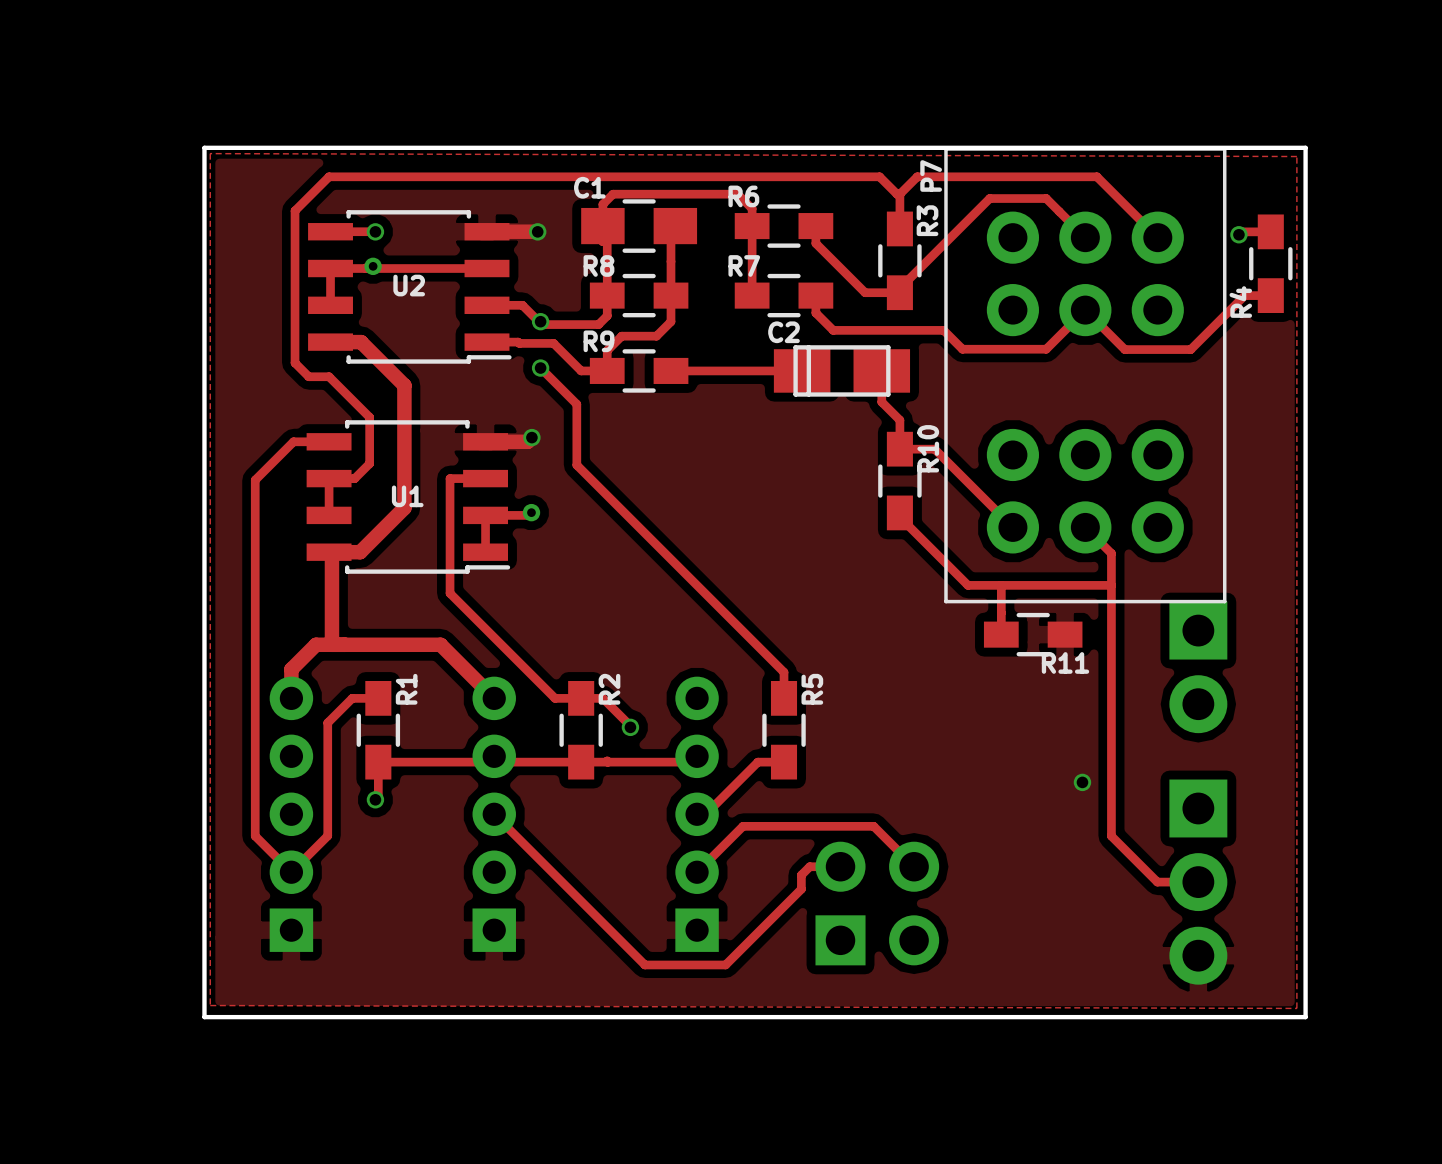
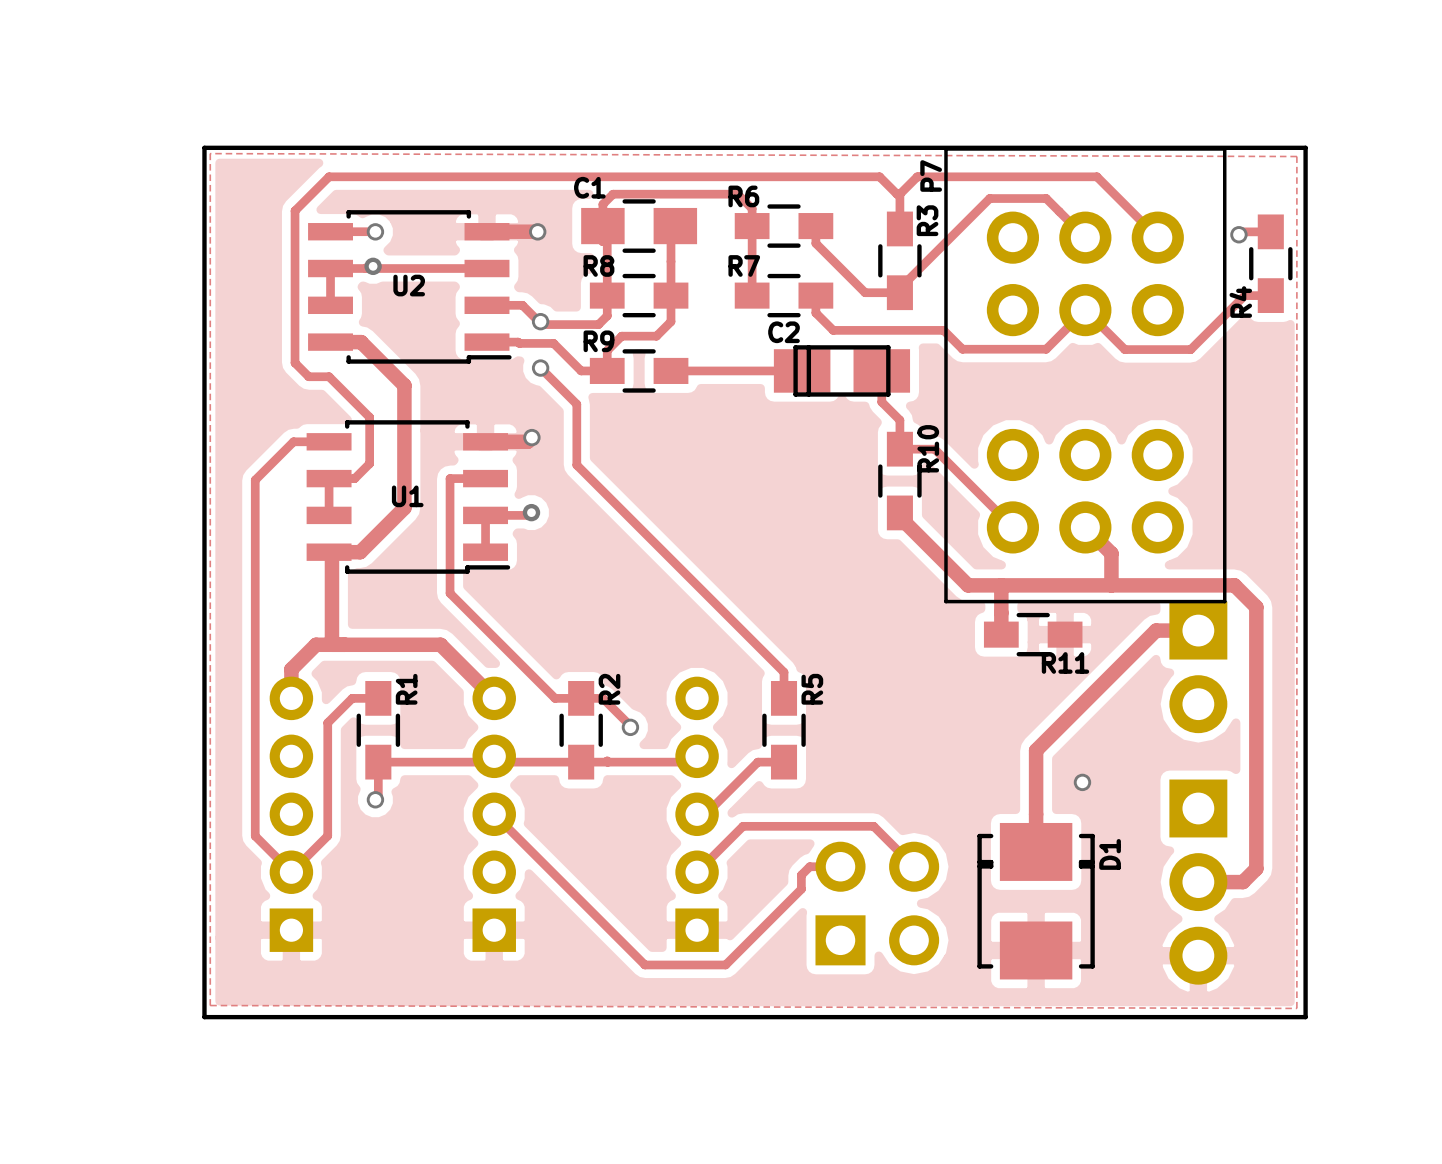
track width: thin (899, 512) (899, 517) (968, 585) (1111, 585) (1111, 553) (1085, 527) -> thick (899, 512) (899, 517) (968, 585) (1111, 585) (1111, 553) (1085, 527)
track width: thin (1001, 585) (1001, 634) -> thick (1001, 585) (1001, 634)
track: (1111, 585) (1111, 836) (1157, 882) (1198, 882) -> (1111, 585) (1234, 585) (1256, 607) (1256, 868) (1242, 882) (1198, 882)
track: none -> (1198, 630) (1156, 630) (1036, 750) (1036, 851)
D1: none -> (1036, 901)

